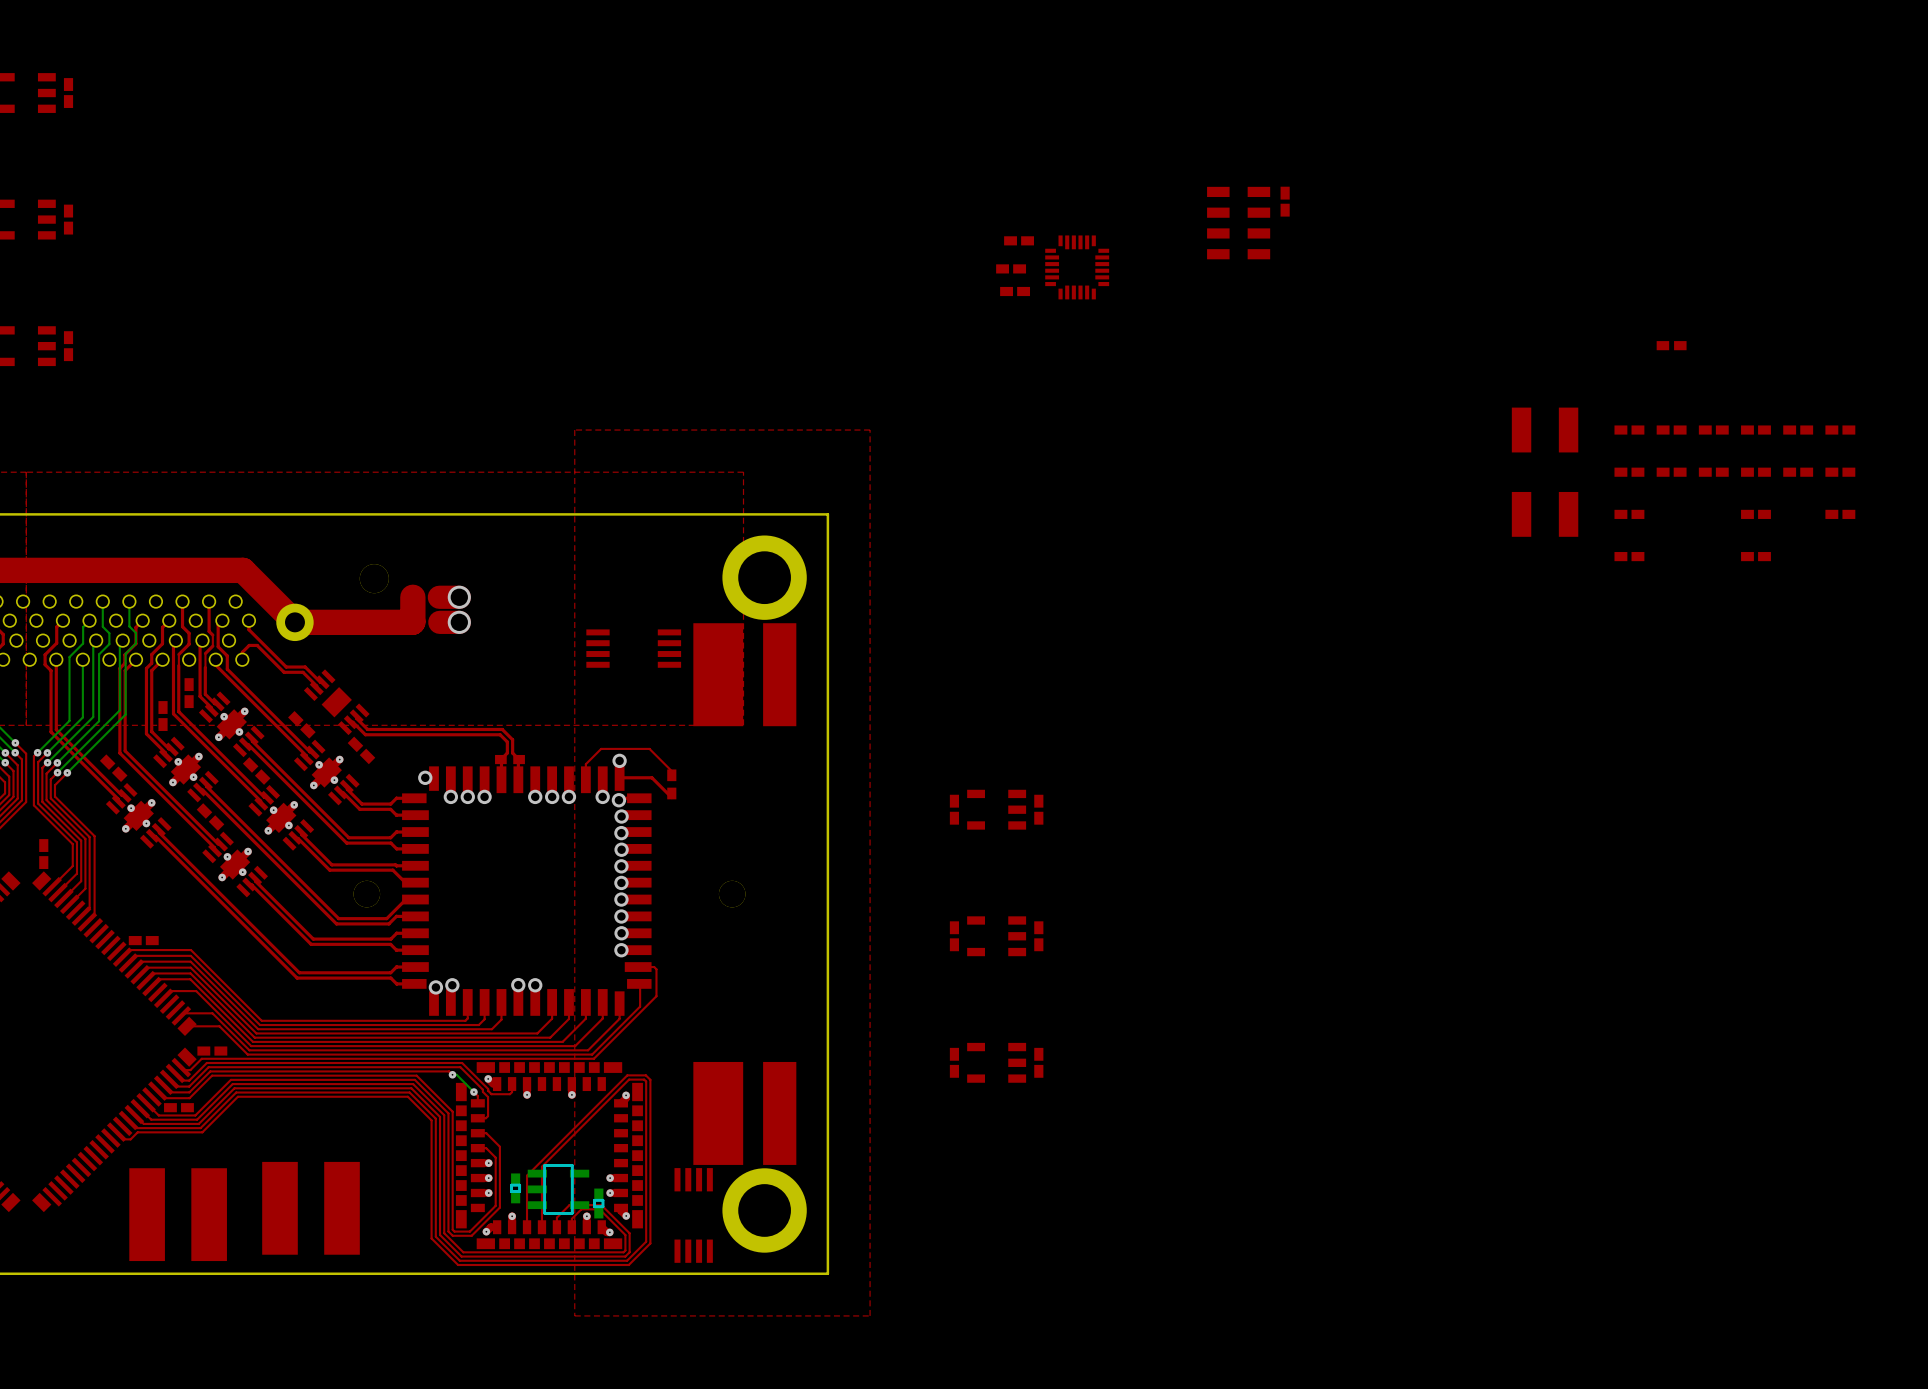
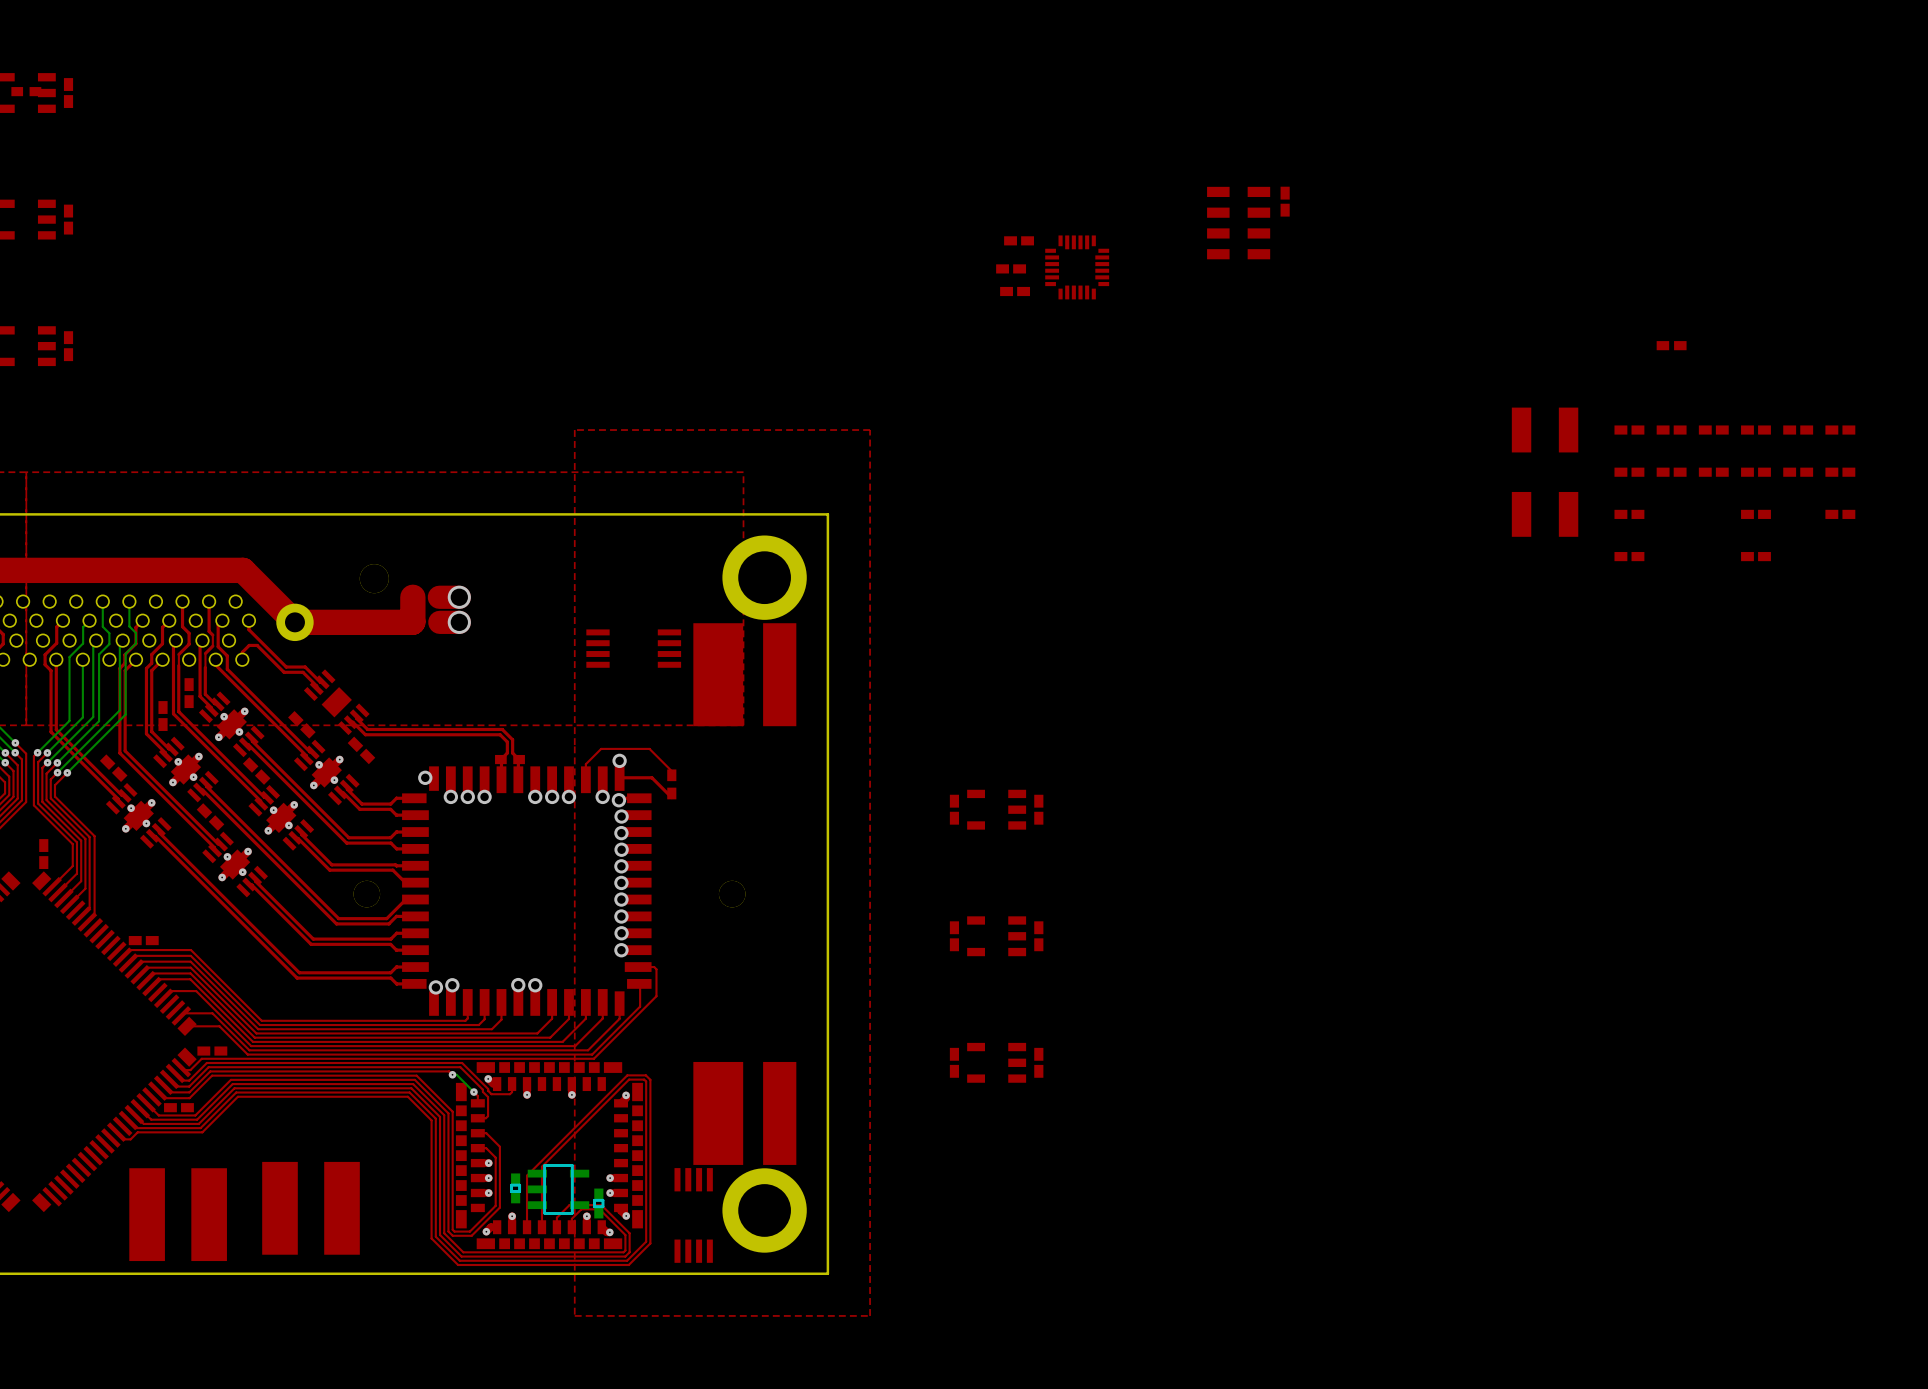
part: none -> (26, 91)

